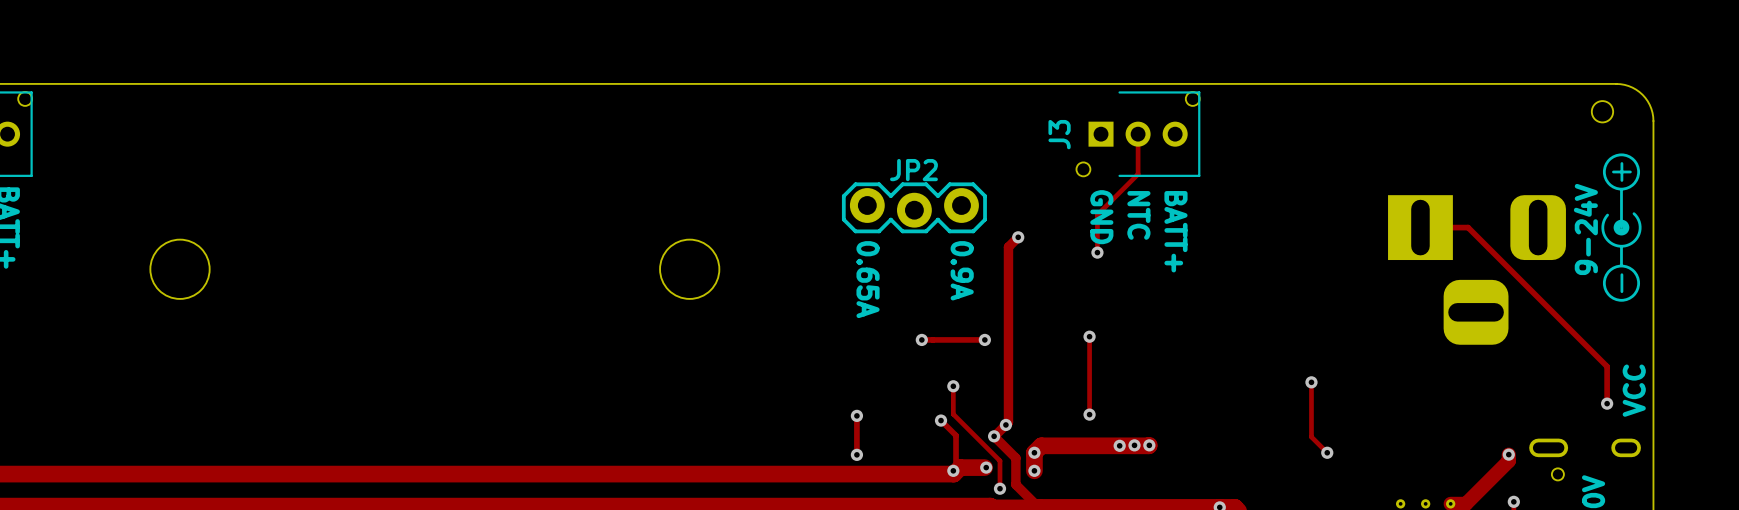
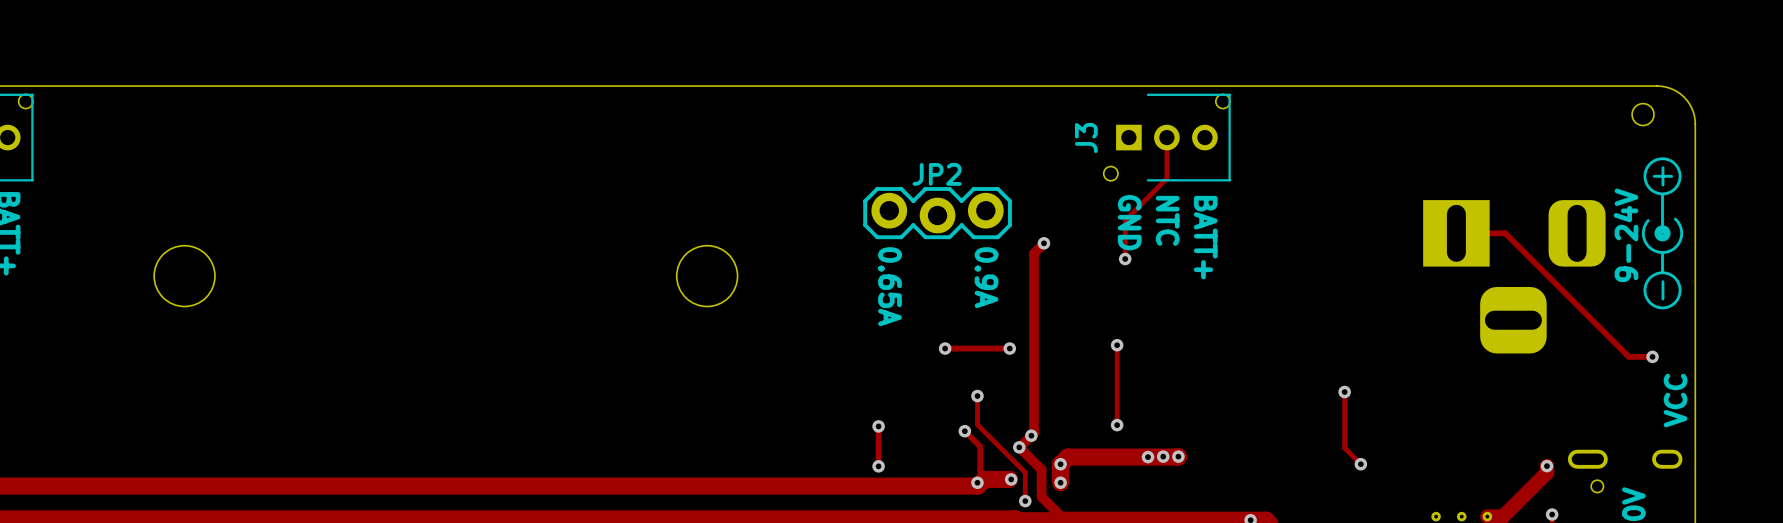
track: (1588, 348) (1607, 366) (1607, 403) -> (1628, 356) (1652, 356)
via position: (1607, 403) -> (1652, 356)

